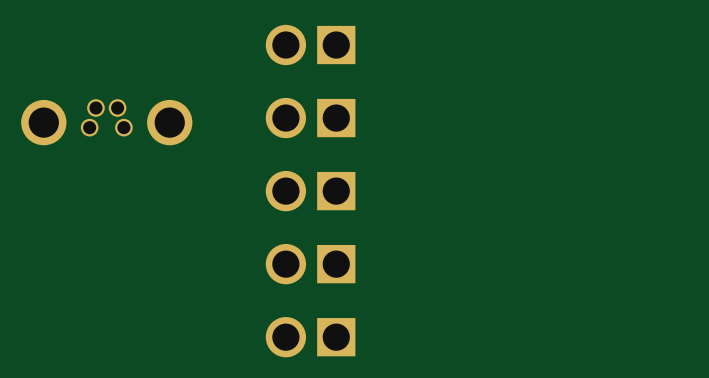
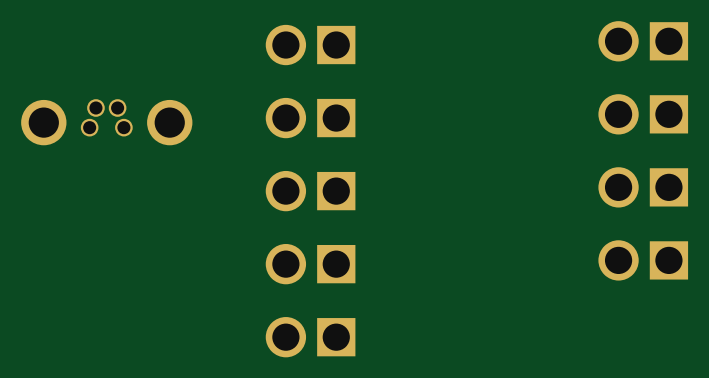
part: none -> (643, 41)
part: none -> (643, 114)
part: none -> (643, 187)
part: none -> (643, 260)

